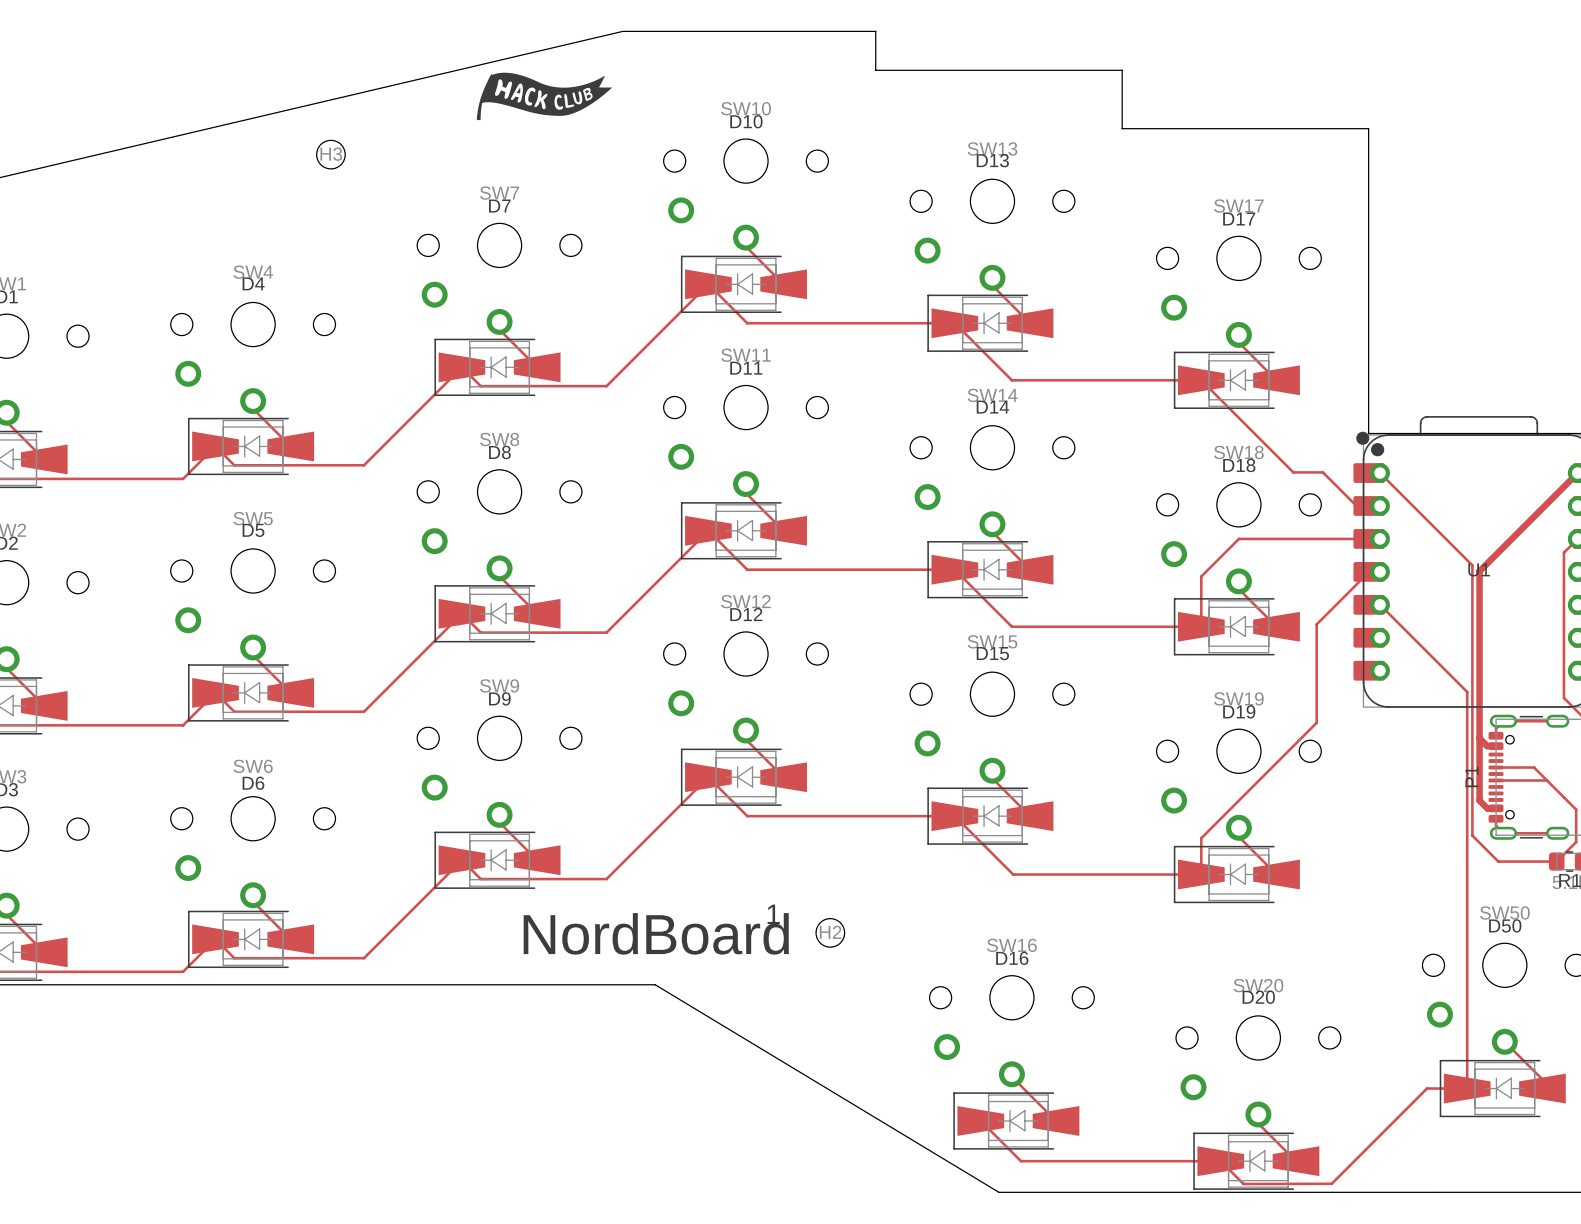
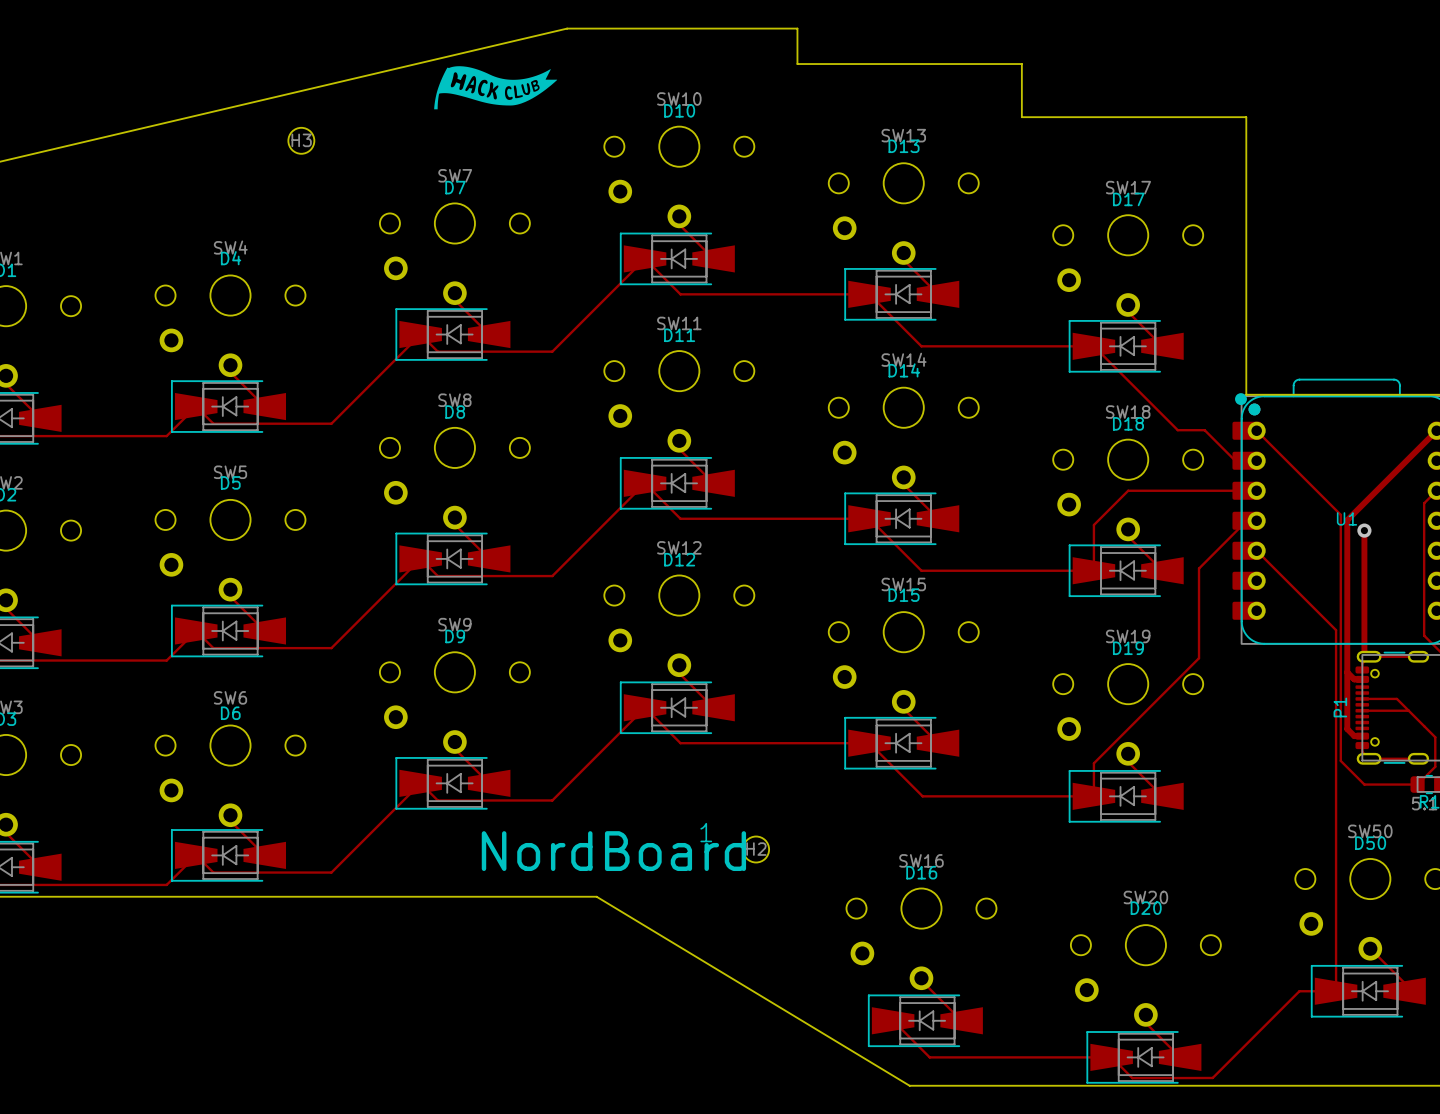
track: none -> (1364, 530) (1364, 652) (1369, 656)
via: none -> (1364, 530)

